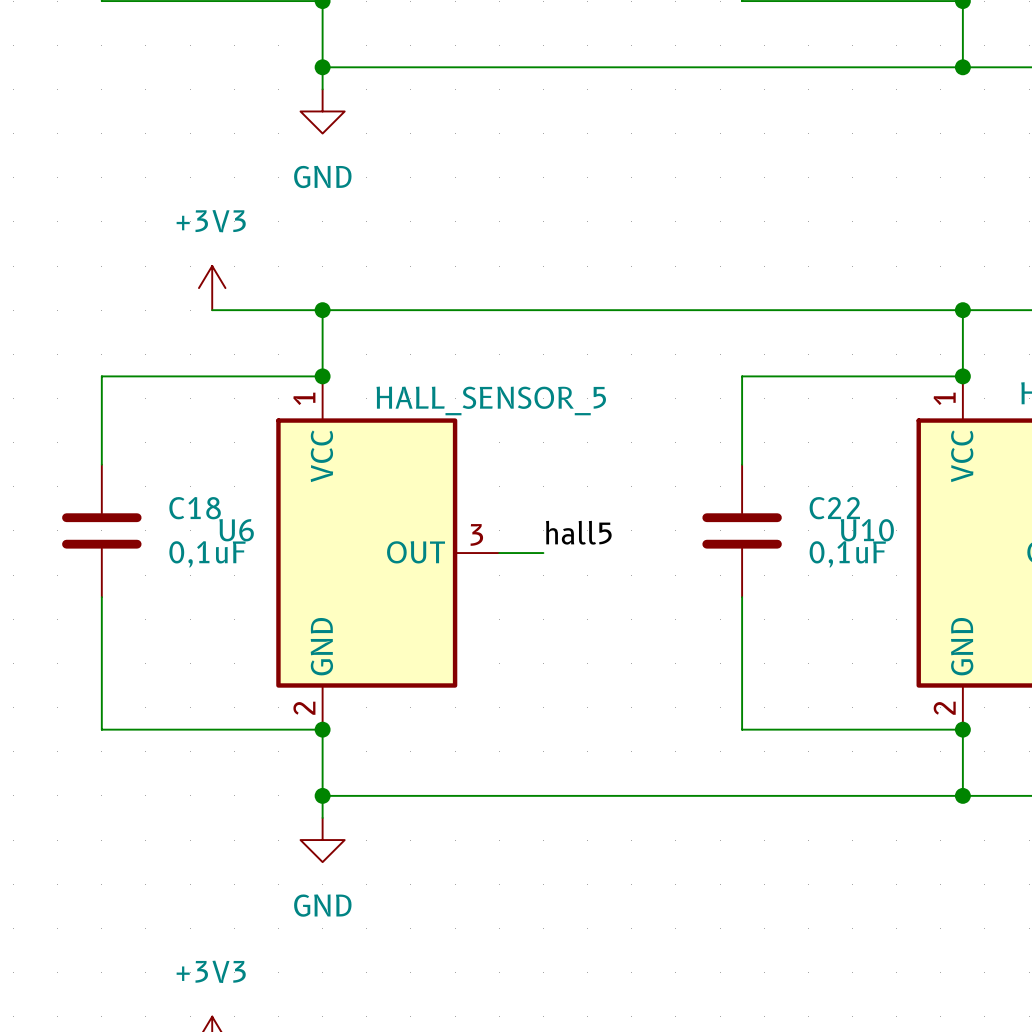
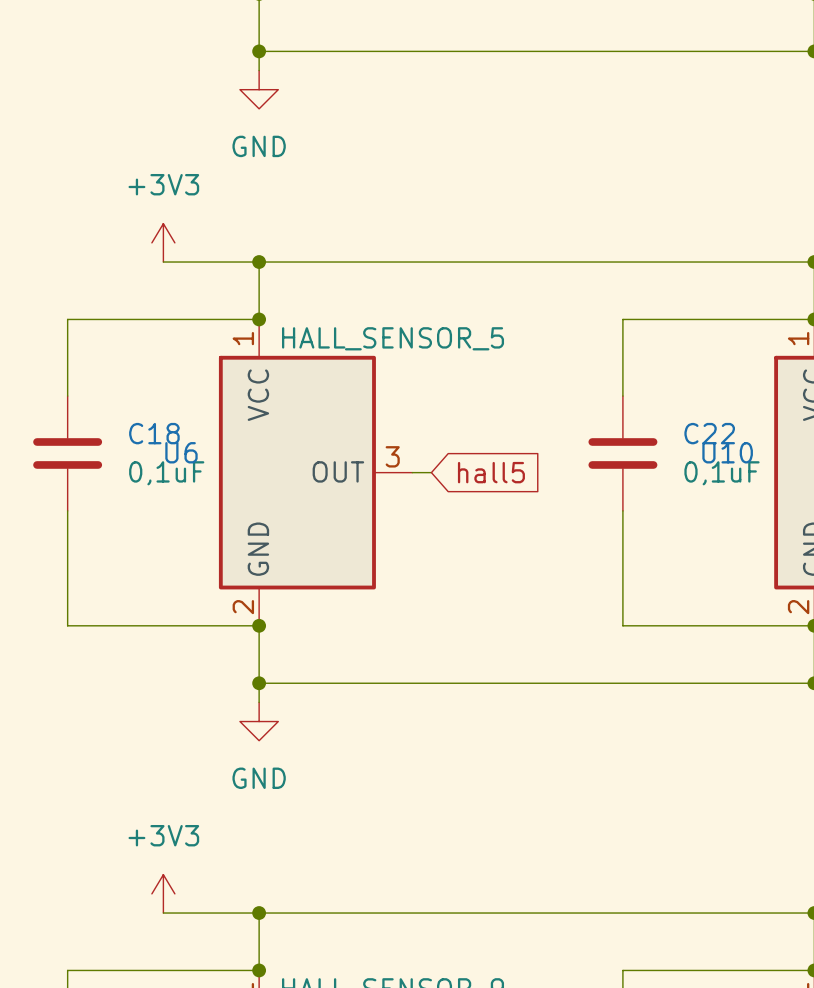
label: hall5 (578, 532) -> none
global label: none -> hall5 (491, 472)
wire: (521, 553) (543, 553) -> none

